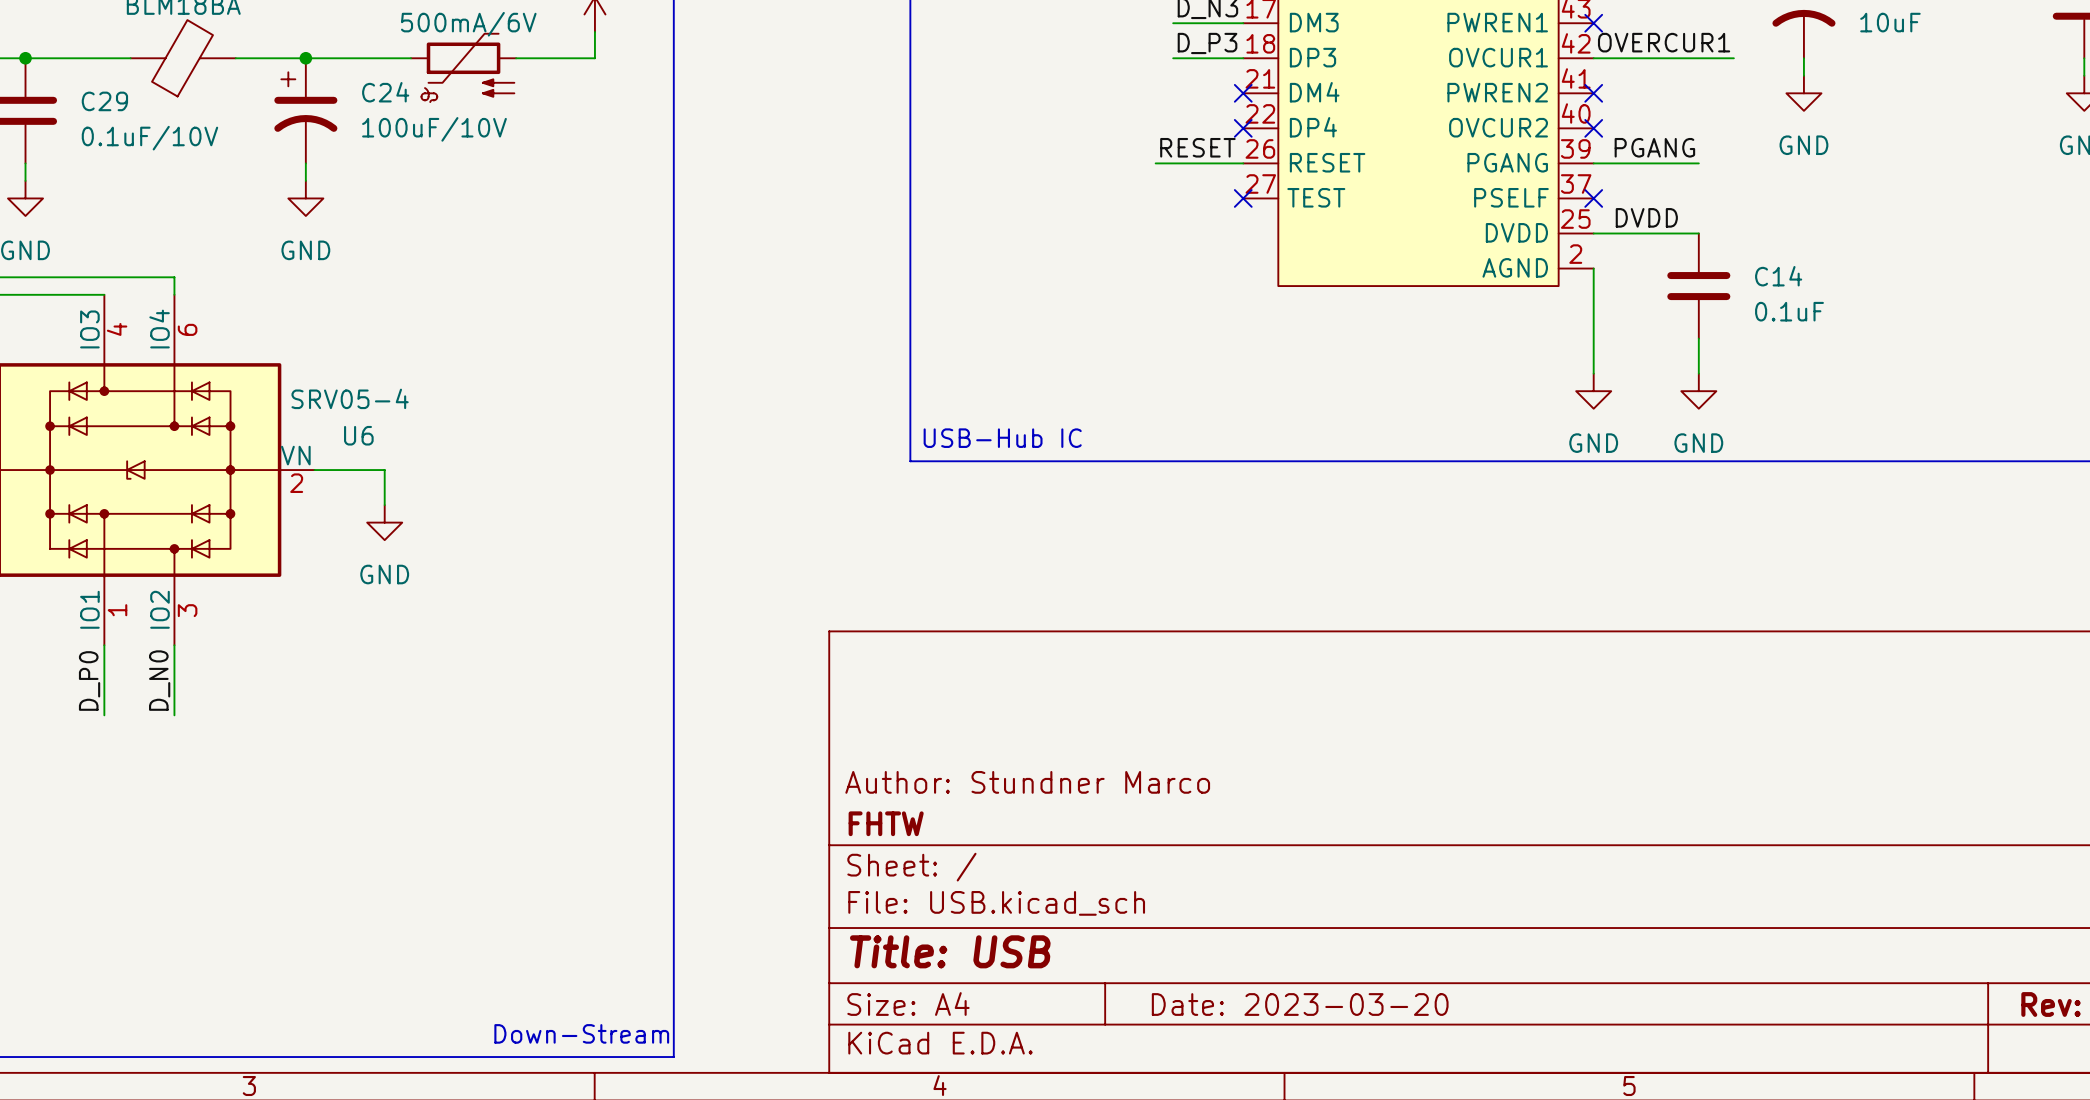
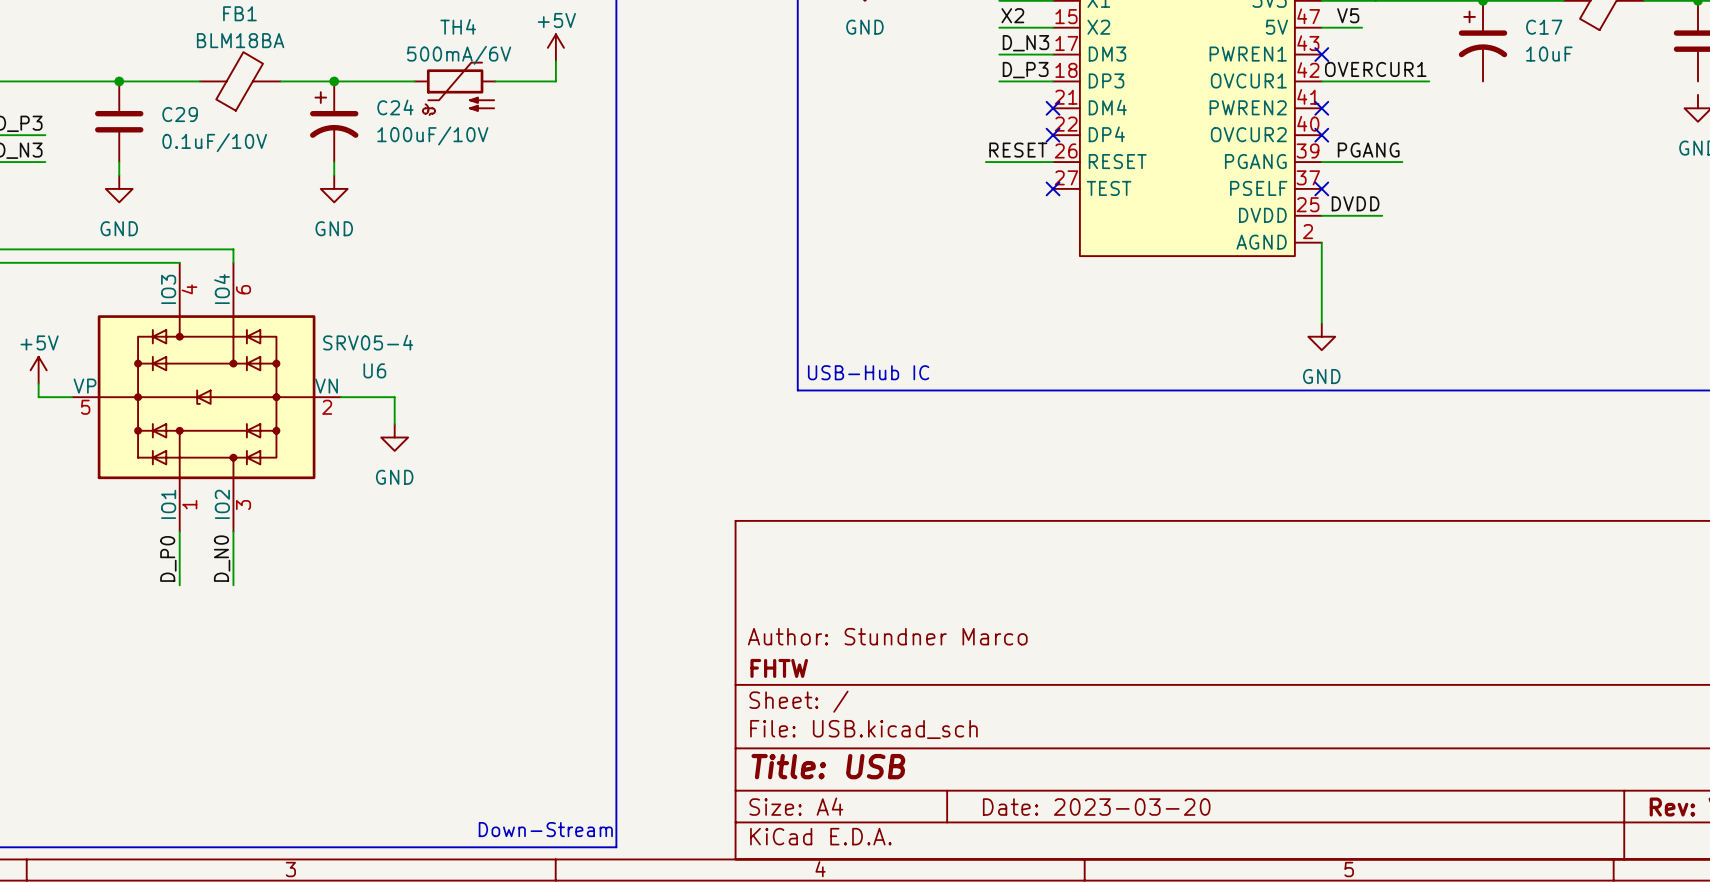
wire: (1803, 58) (1803, 75) -> none
wire: (2084, 58) (2084, 75) -> none
power symbol: GND (1803, 93) -> none
label position: DVDD (1646, 217) -> DVDD (1355, 203)
wire: (1672, 233) (1698, 233) -> none
C14: 0.1uF (1698, 286) -> none
wire: (1698, 338) (1698, 373) -> none
power symbol: GND (1698, 391) -> none

